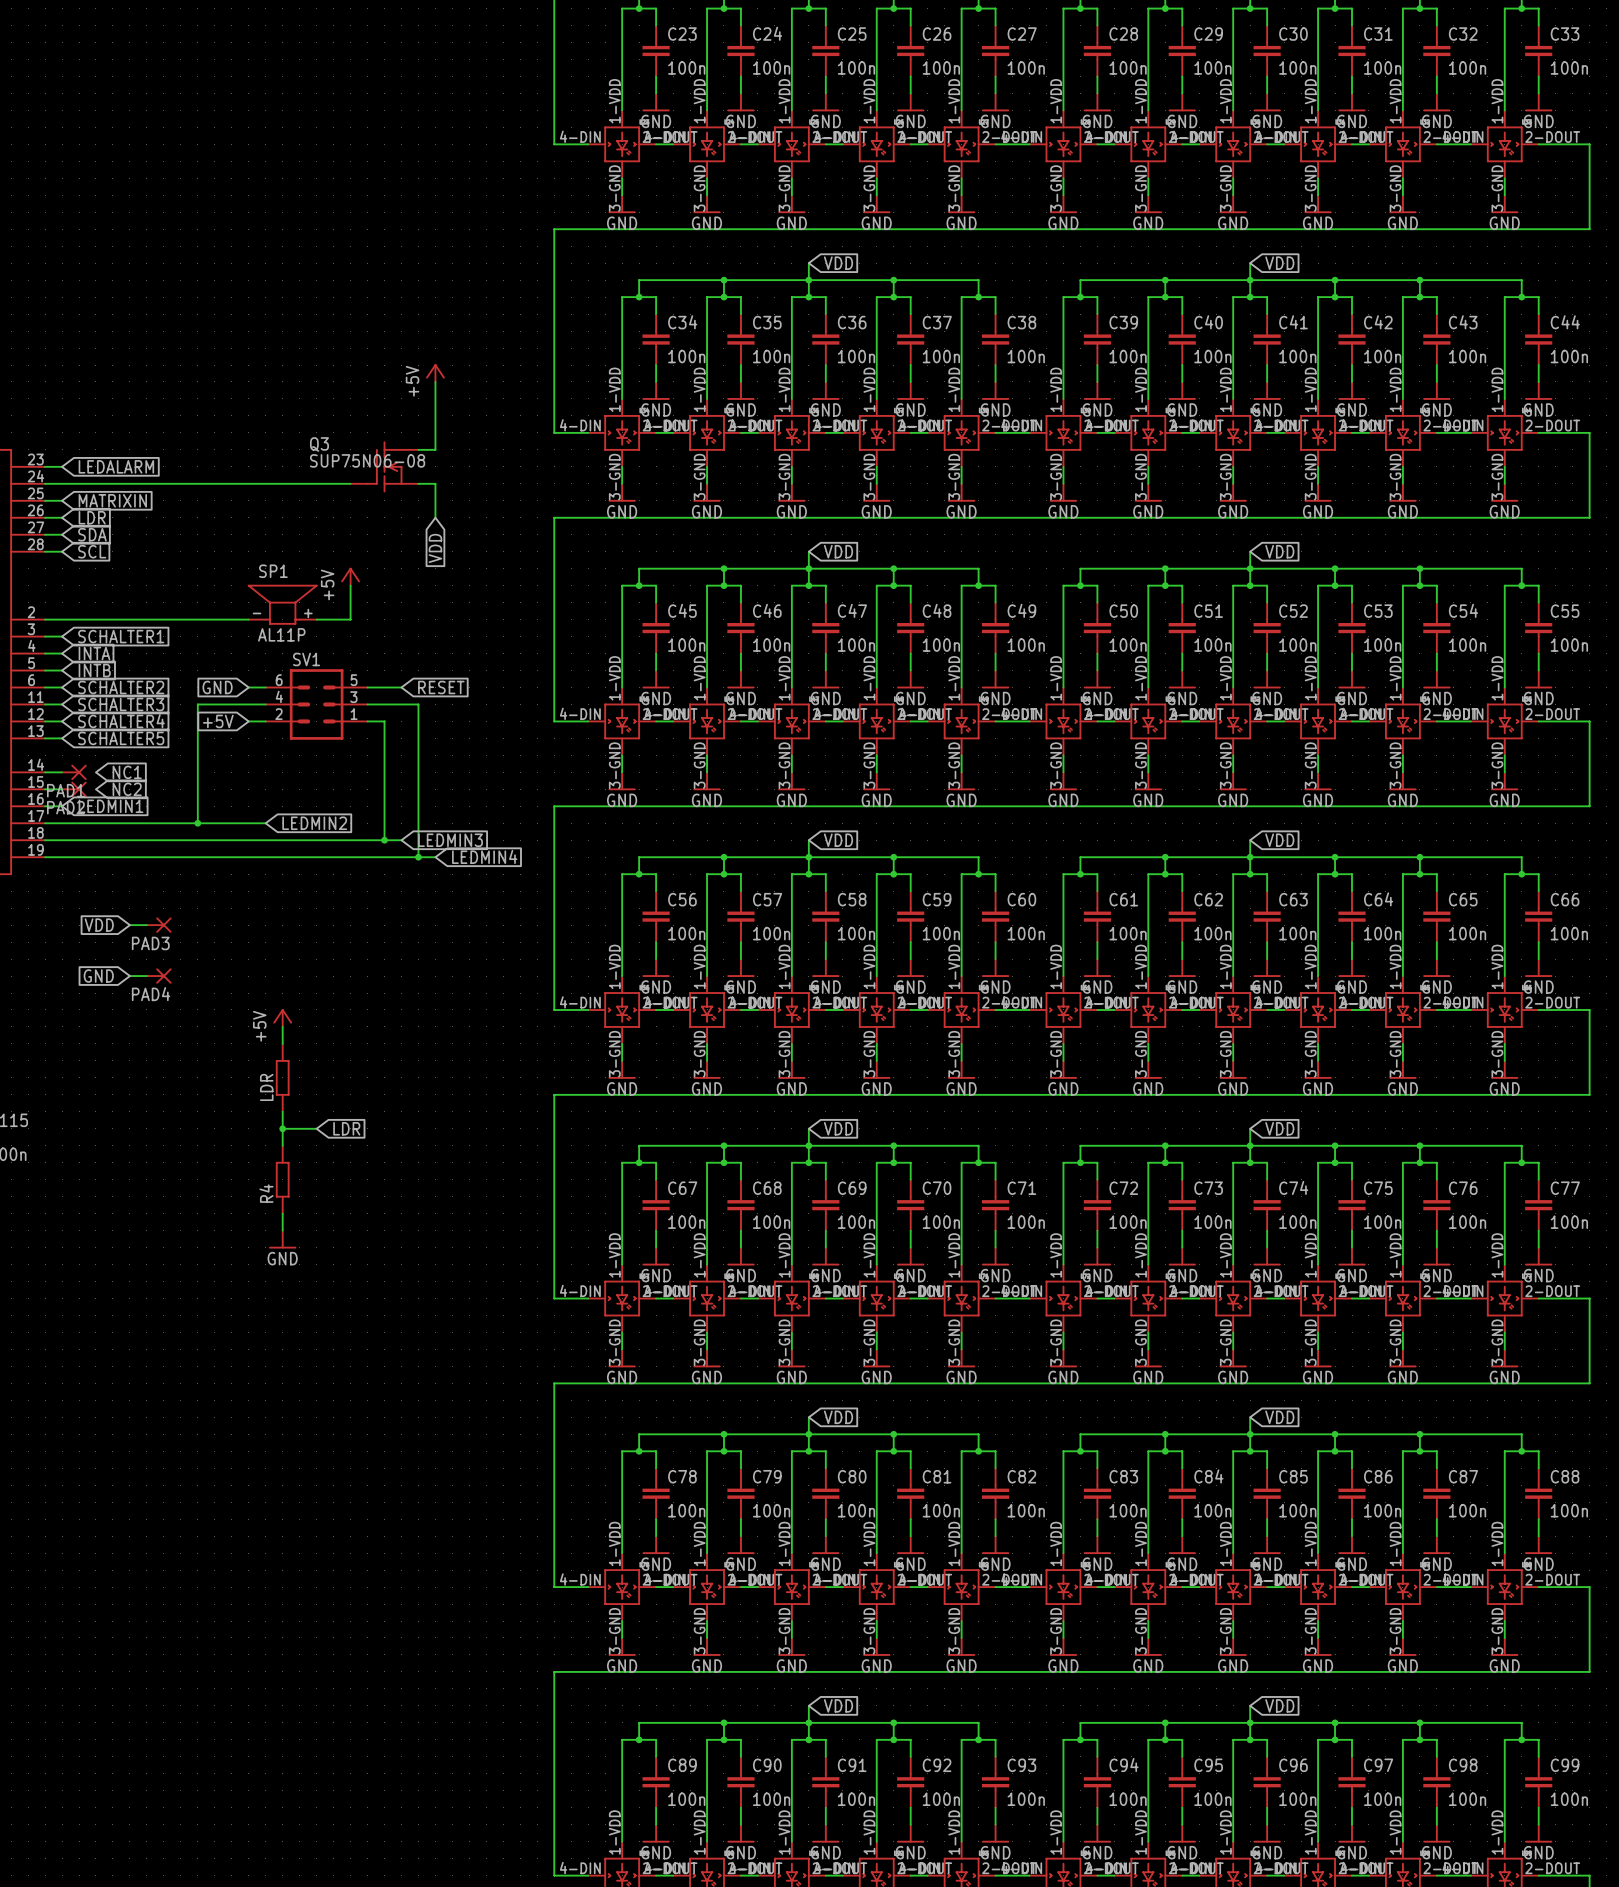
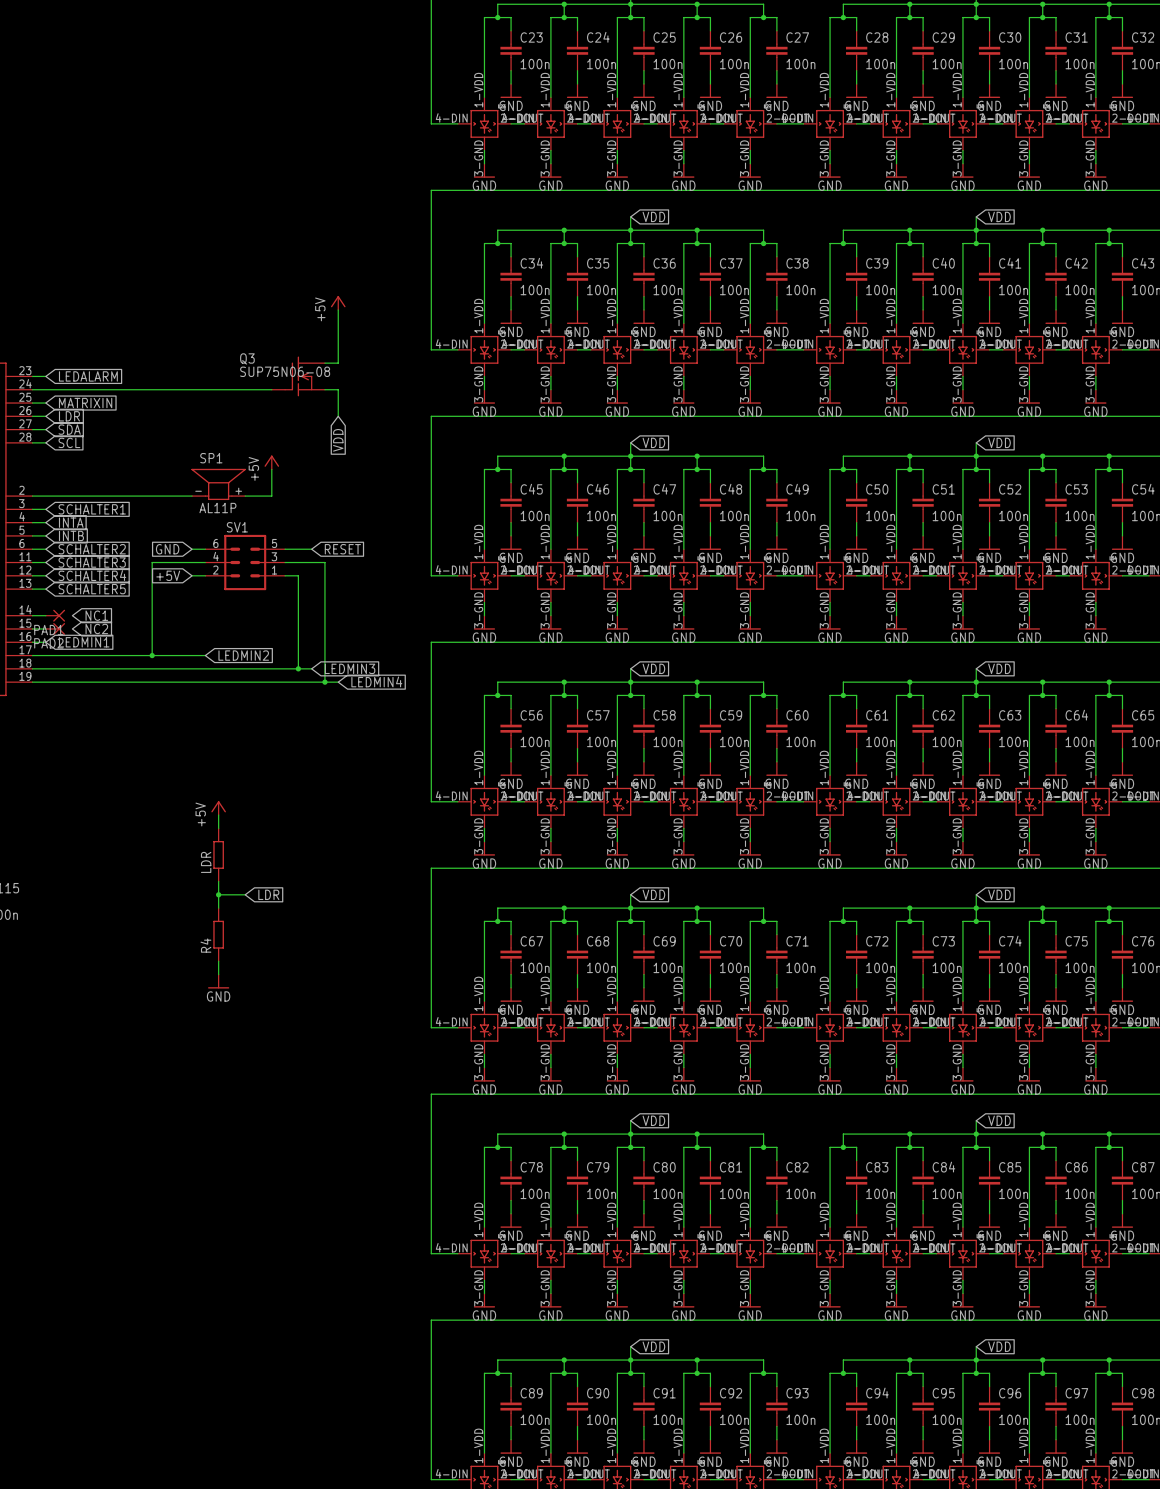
global label: VDD (99, 925) -> none
wire: (129, 925) (146, 925) -> none
PAD3: (159, 925) -> none
global label: GND (98, 976) -> none
wire: (129, 976) (146, 976) -> none
PAD4: (159, 976) -> none

